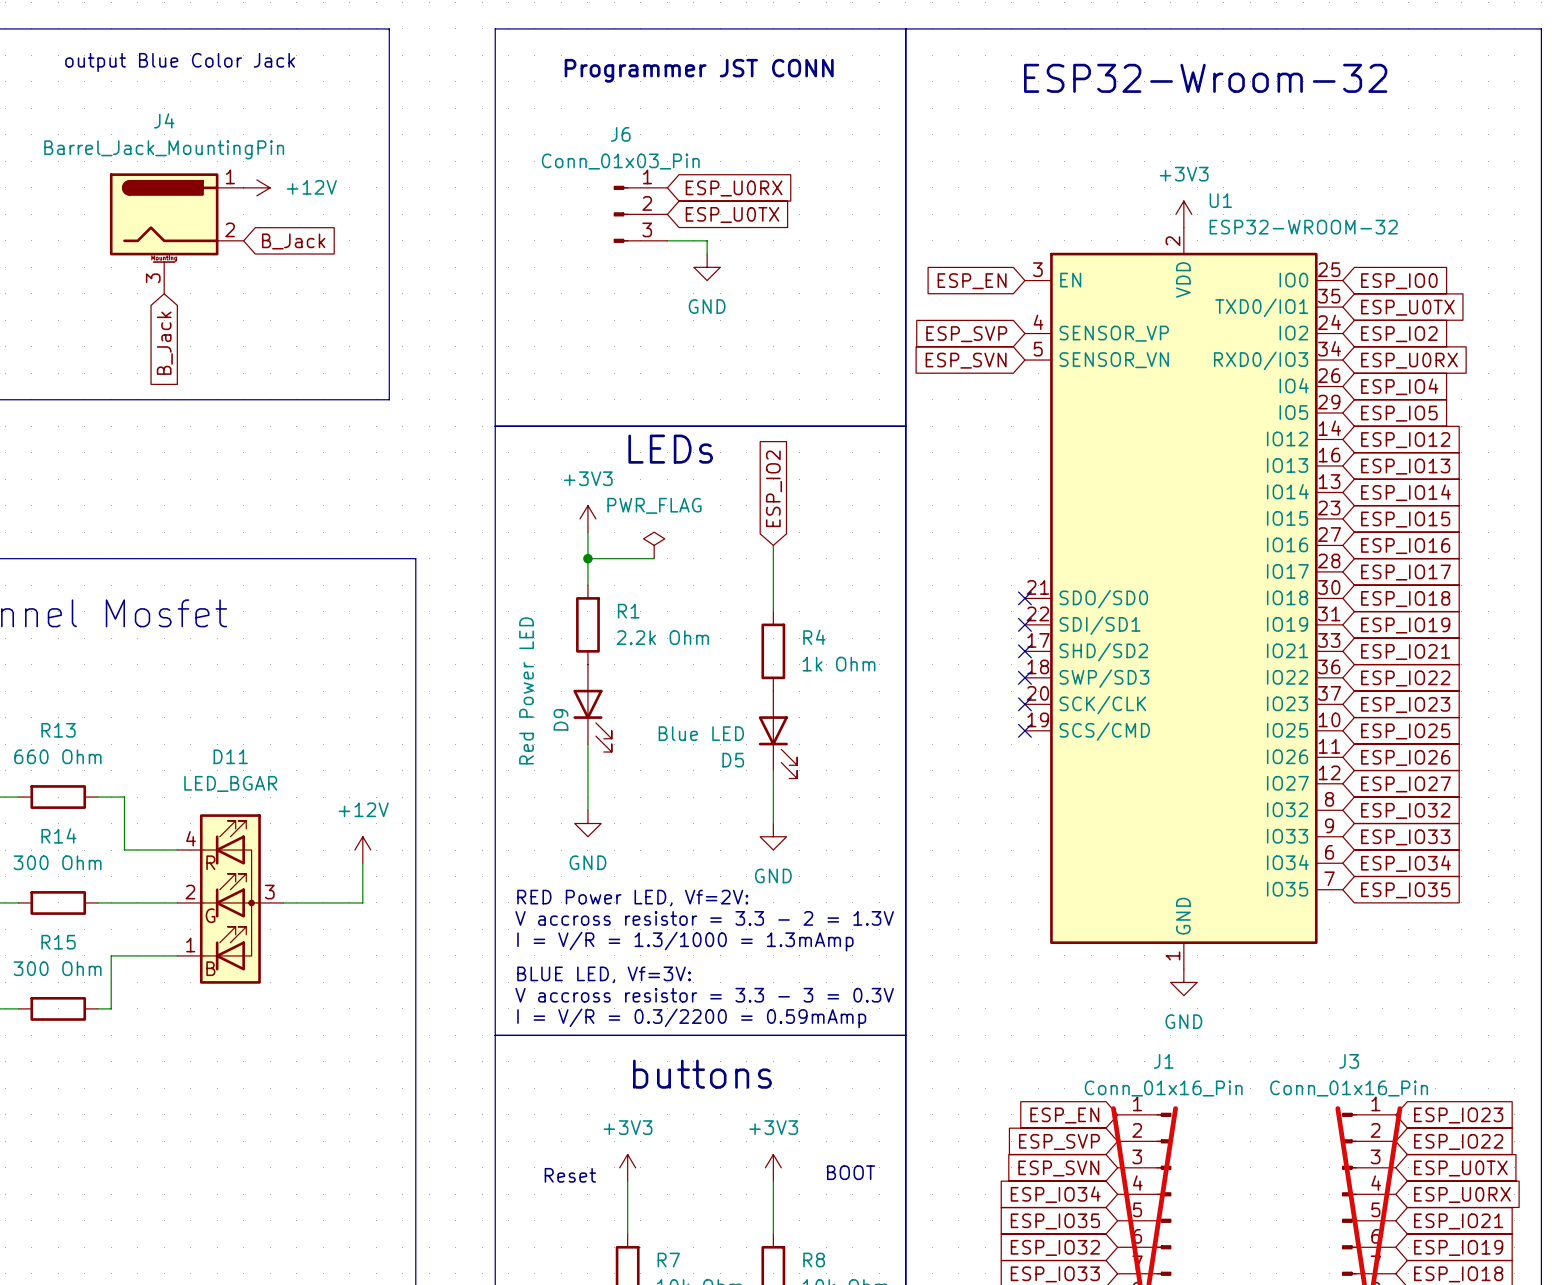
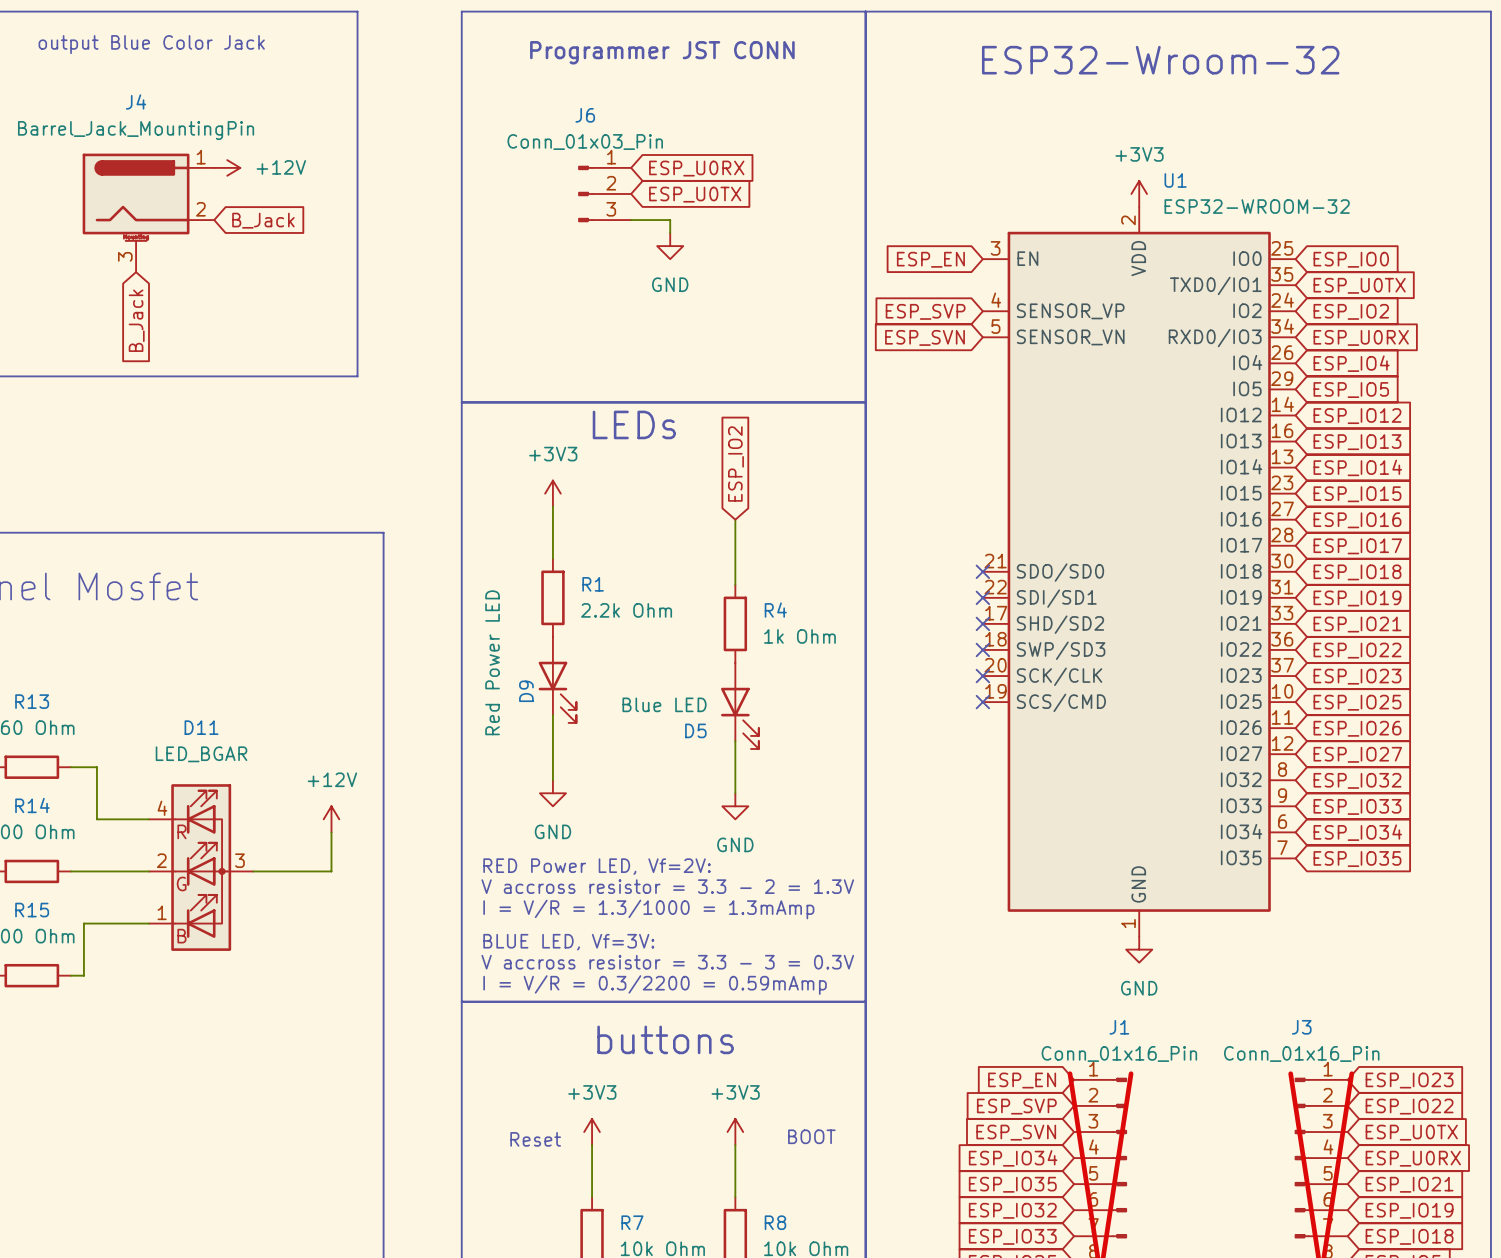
power symbol: PWR_FLAG (654, 545) -> none
wire: (587, 558) (654, 558) -> none
junction: (587, 558) -> none

